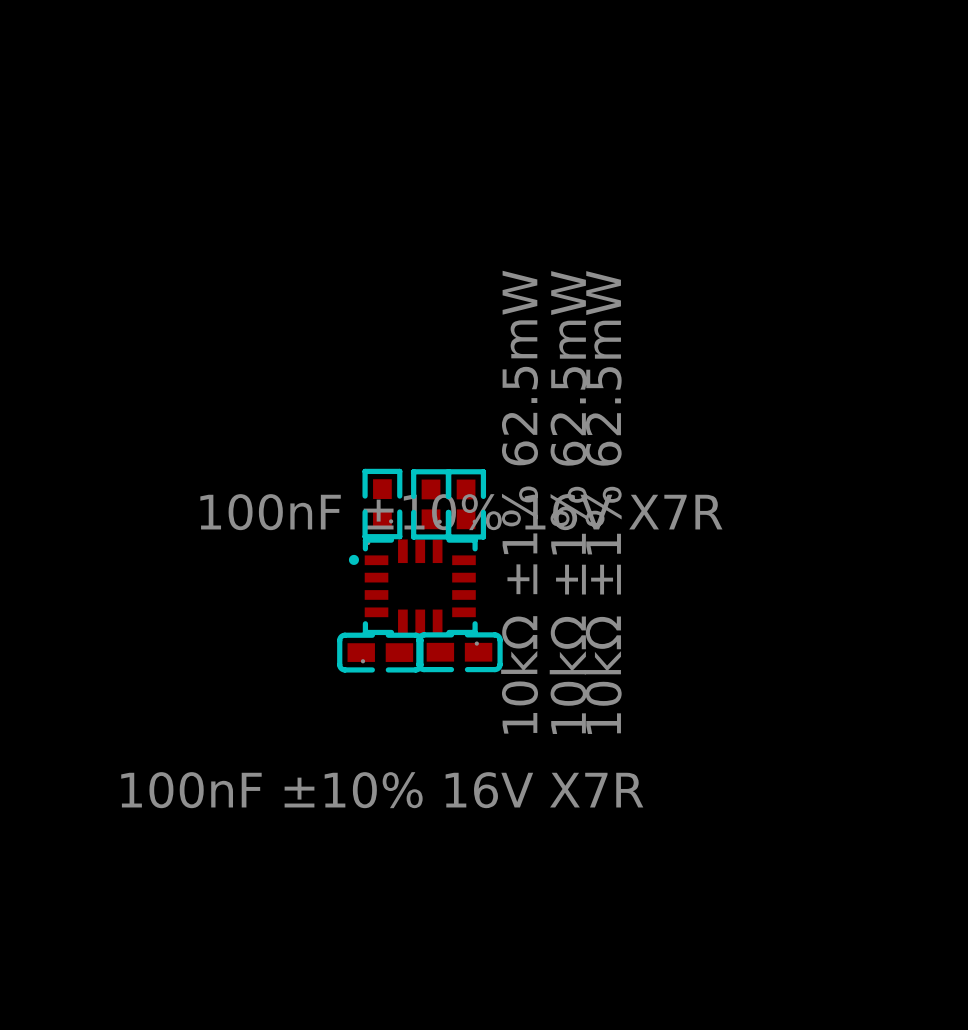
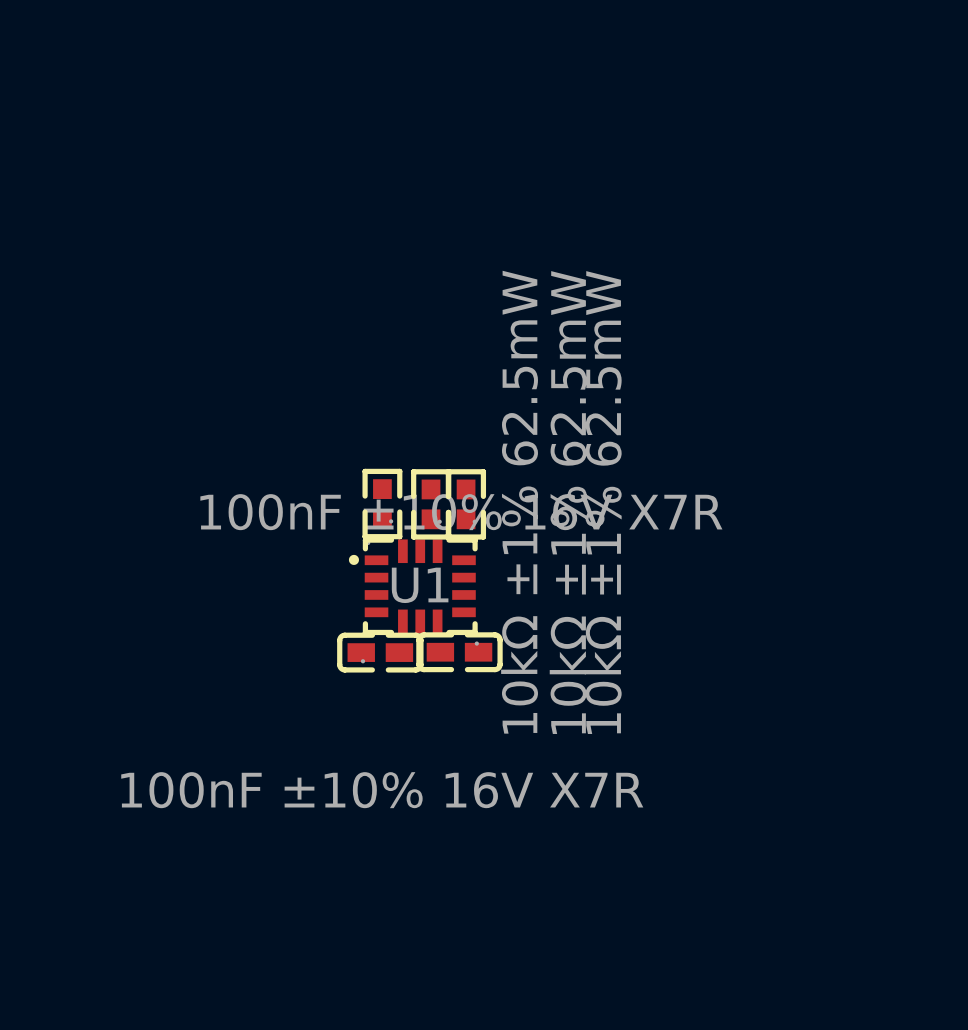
U1 name: none -> U1 (420, 585)

